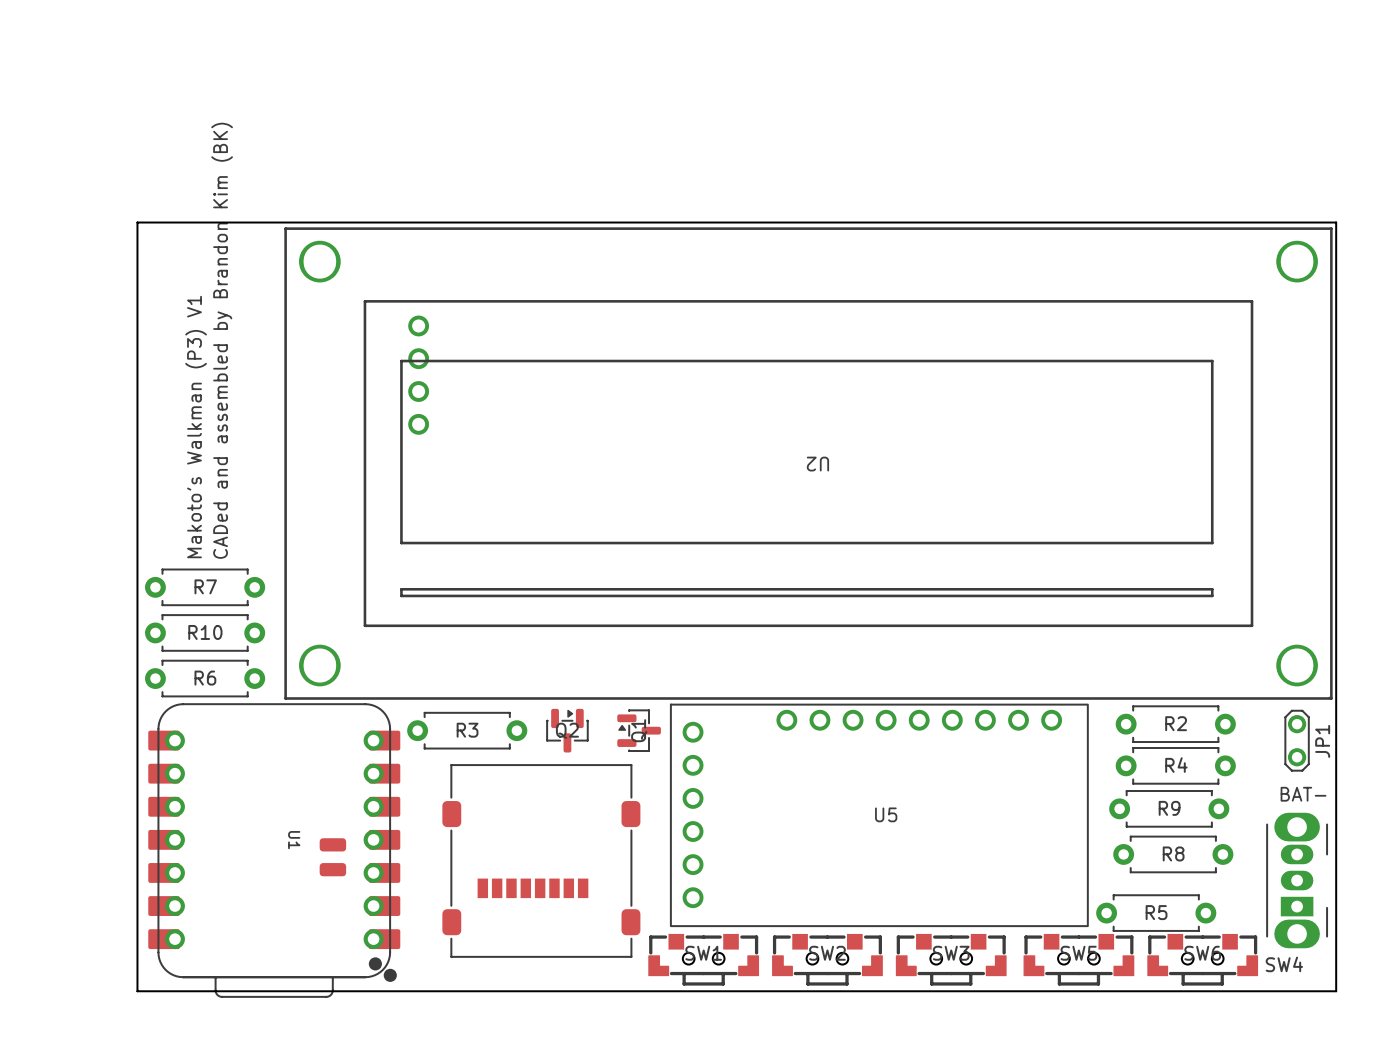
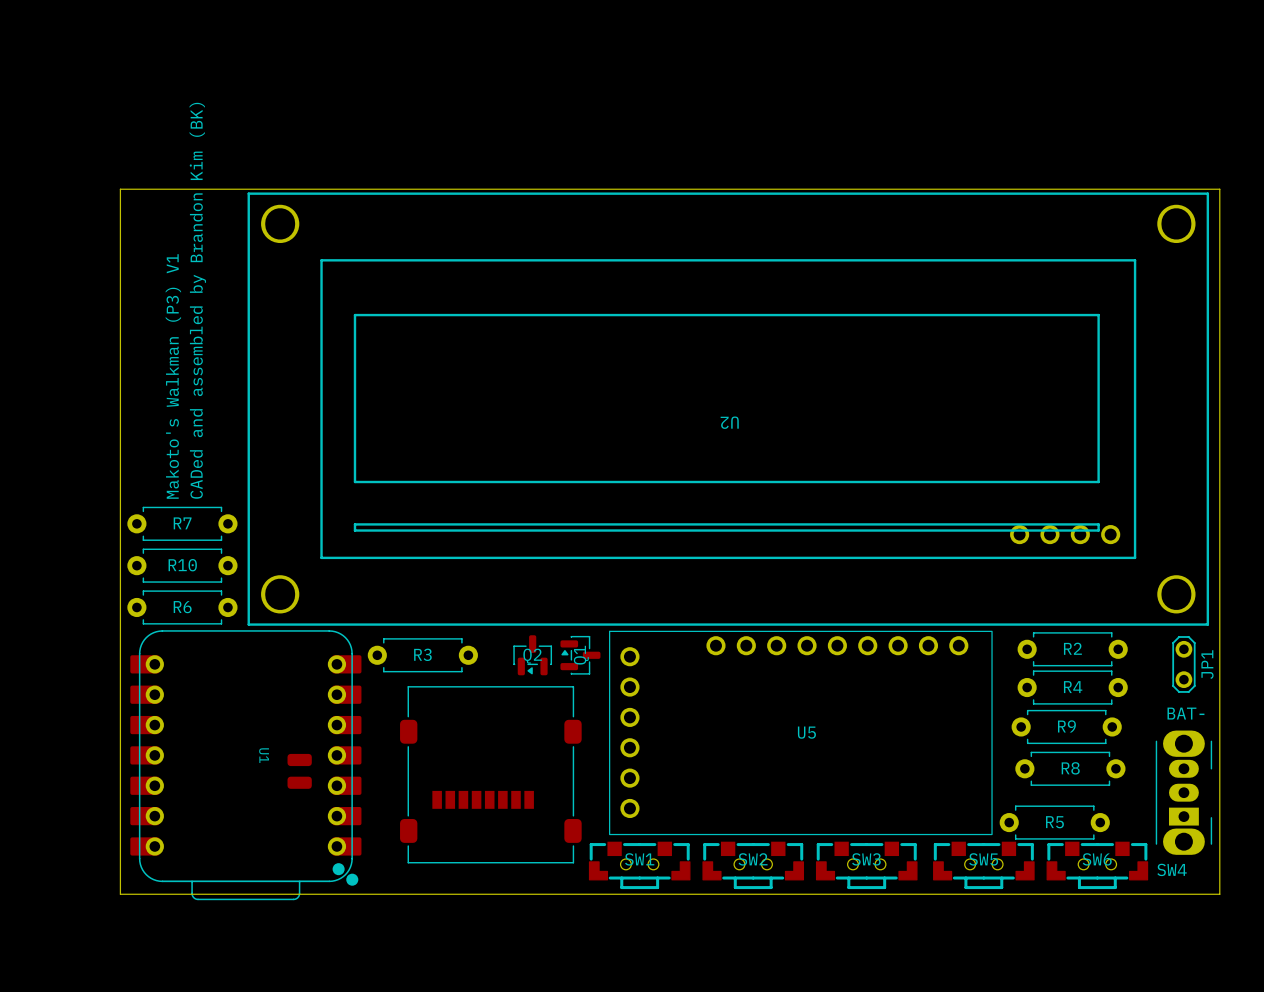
U2 footprint: [284, 227, 1333, 700] -> [247, 192, 1210, 626]
Q2 rotation: 0° (567, 730) -> 180° (532, 655)

